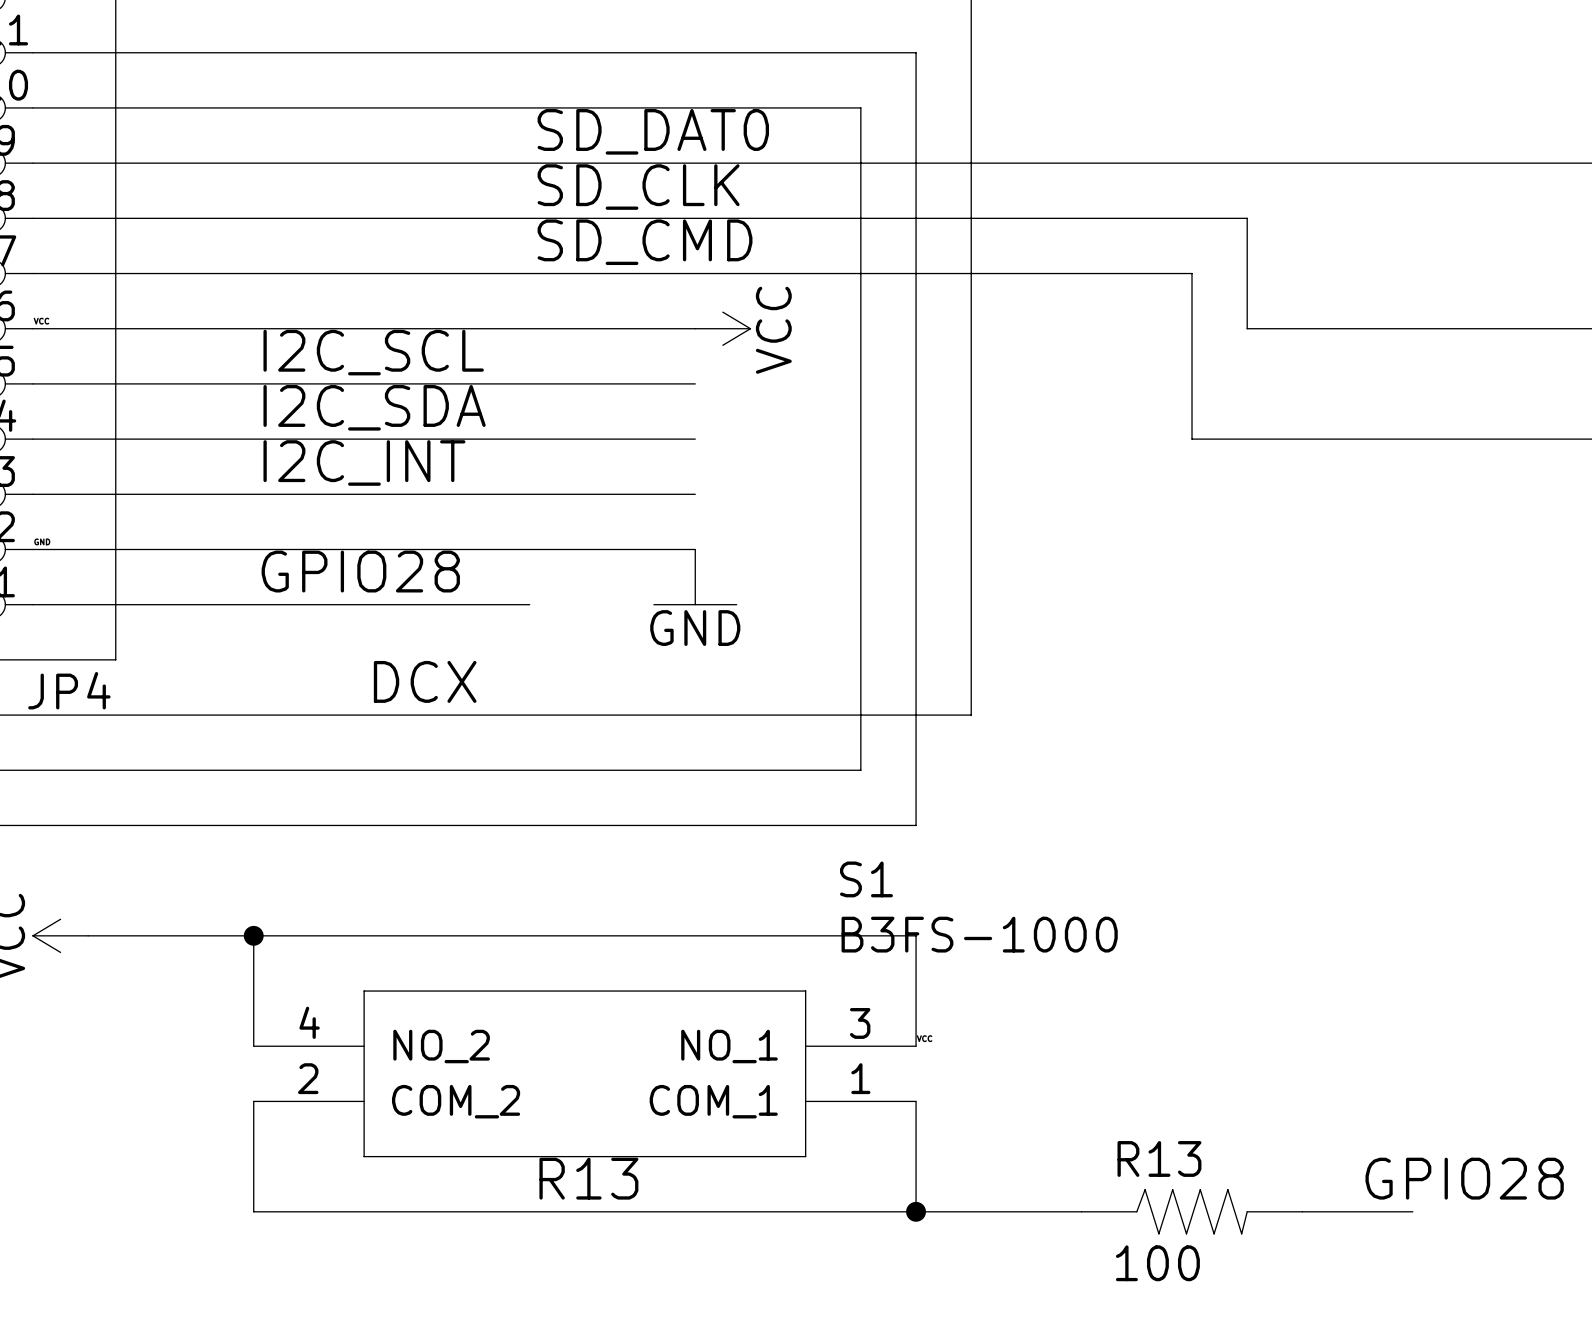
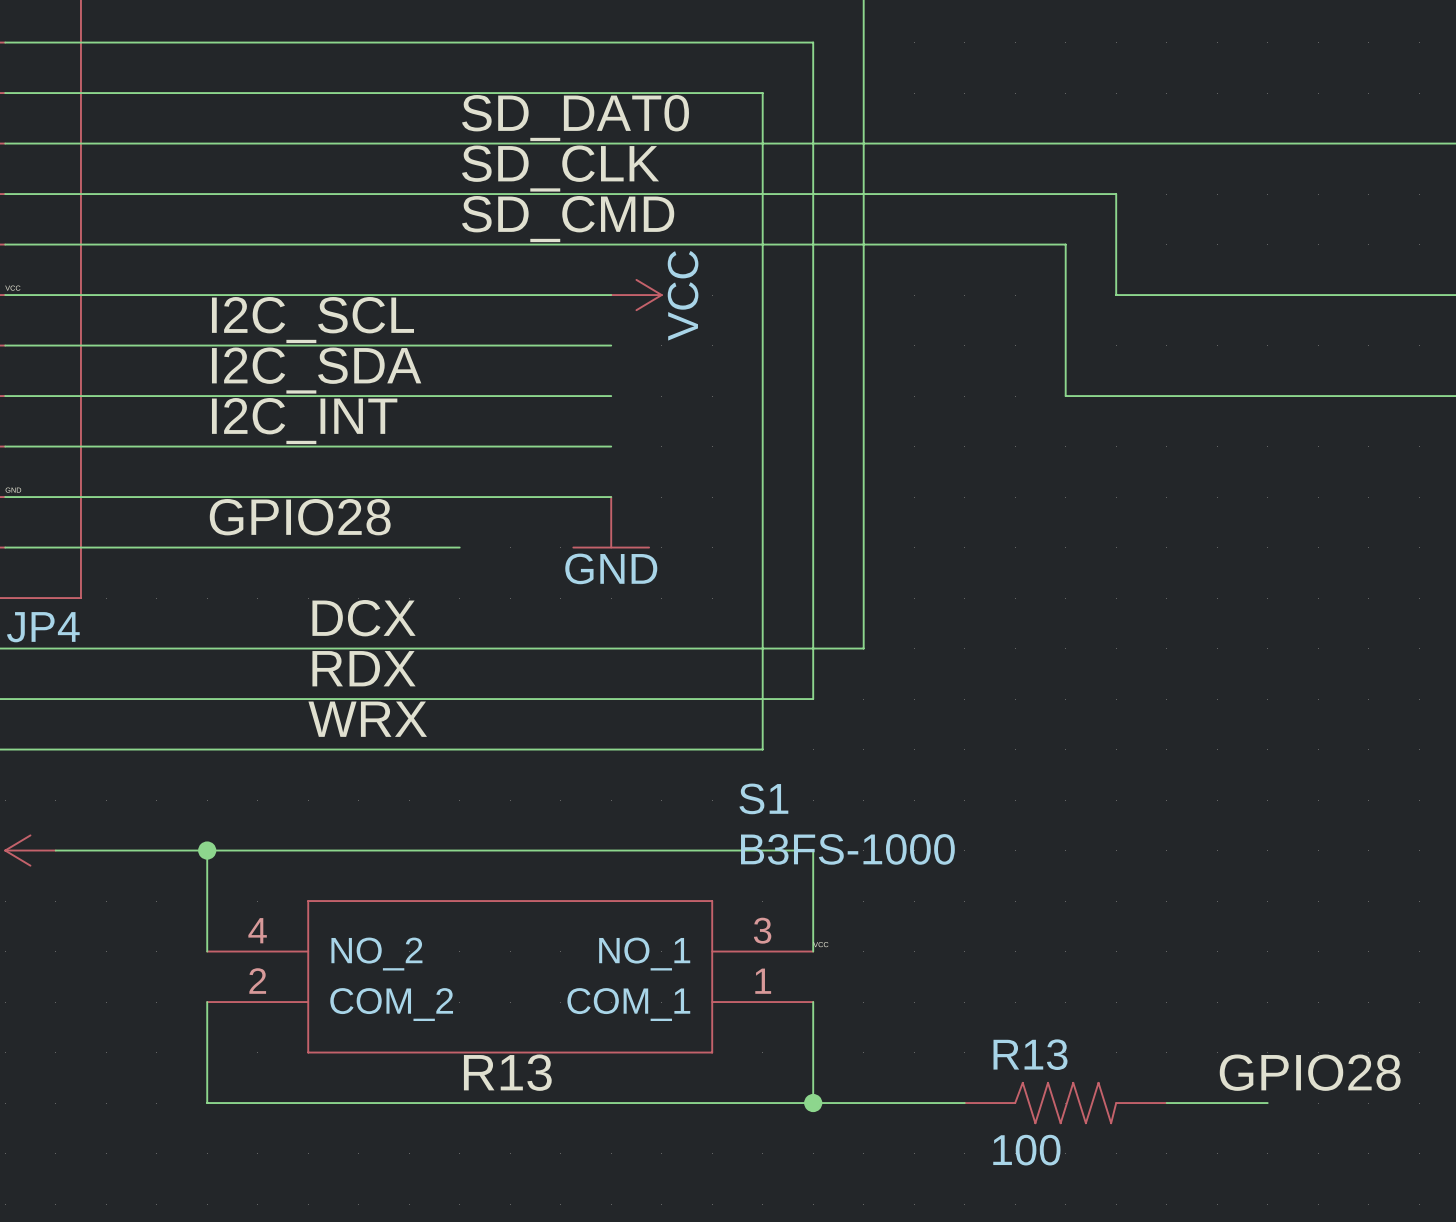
label: none -> RDX (364, 668)
wire: (916, 770) (916, 825) (860, 825) -> (813, 699) (762, 699) (762, 749)
label: none -> WRX (367, 719)

